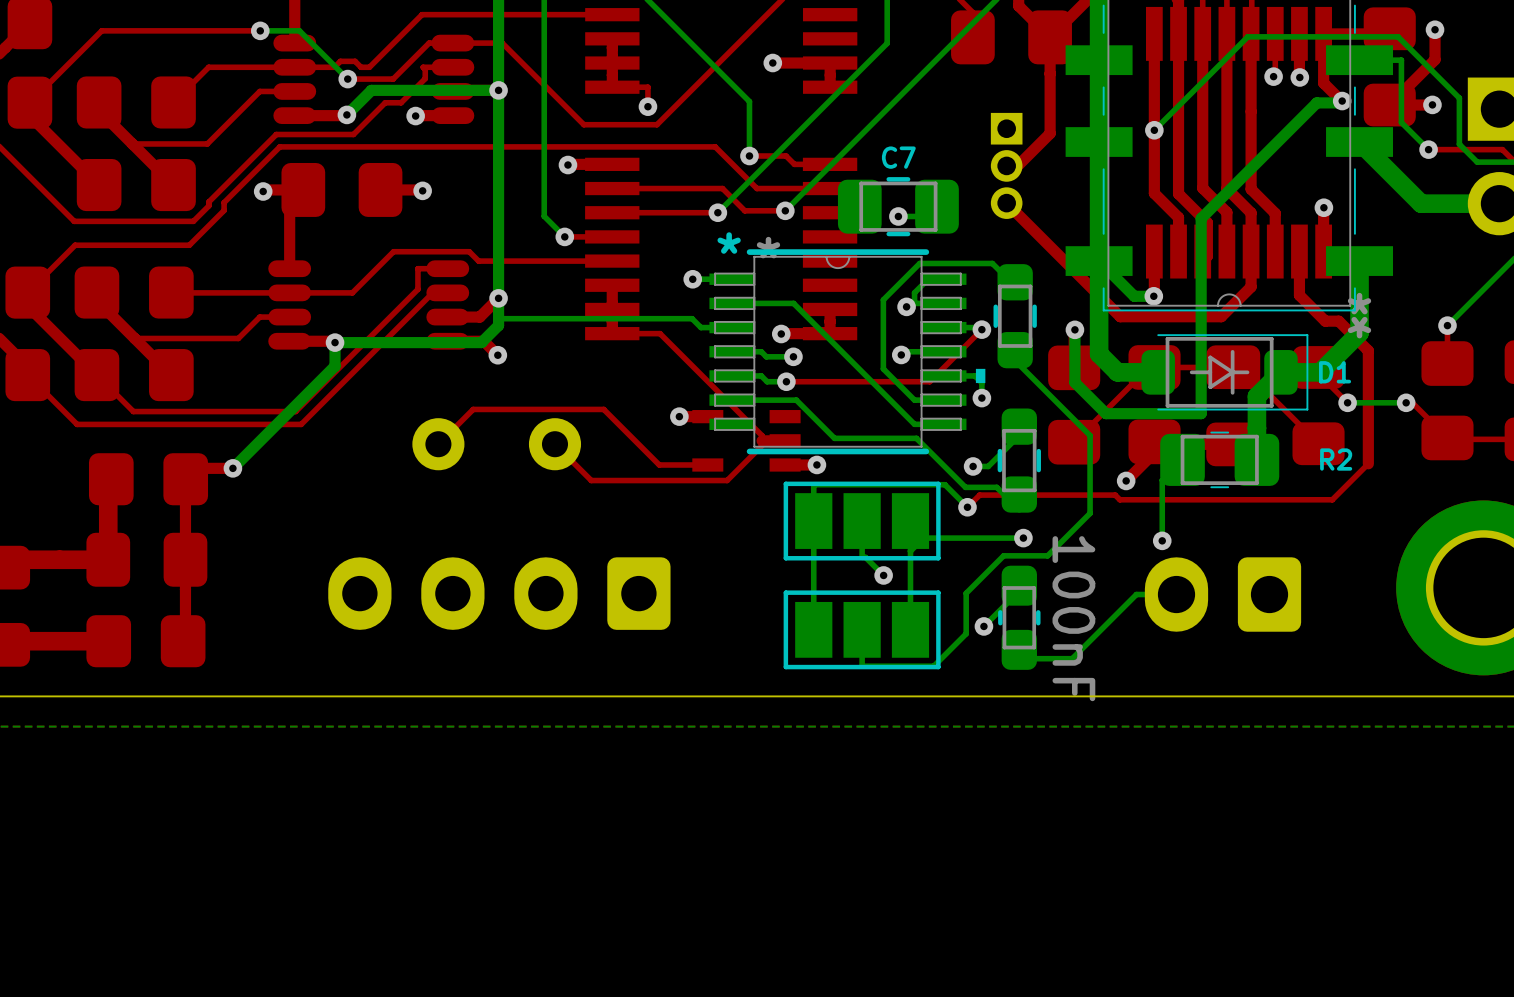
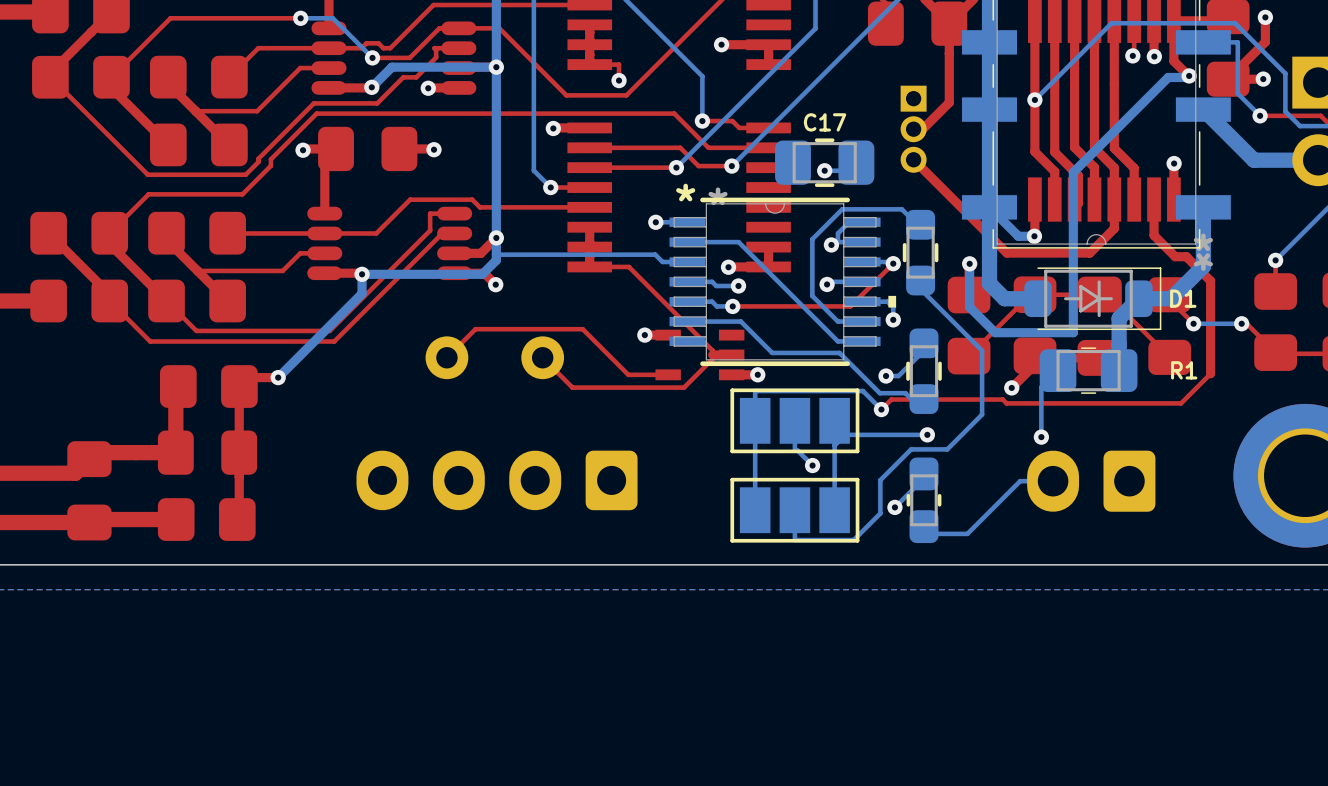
C7 name: C7 (898, 157) -> C17 (825, 122)
R2 name: R2 (1336, 459) -> R1 (1184, 370)
part value: 100nF (1073, 618) -> none

